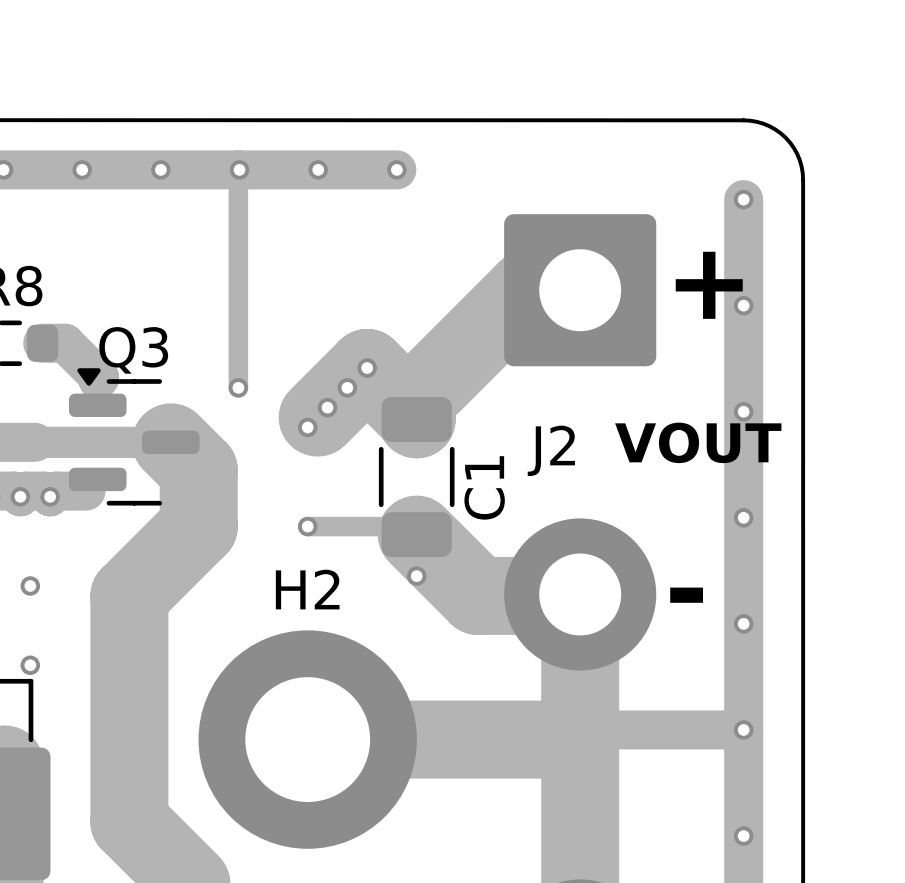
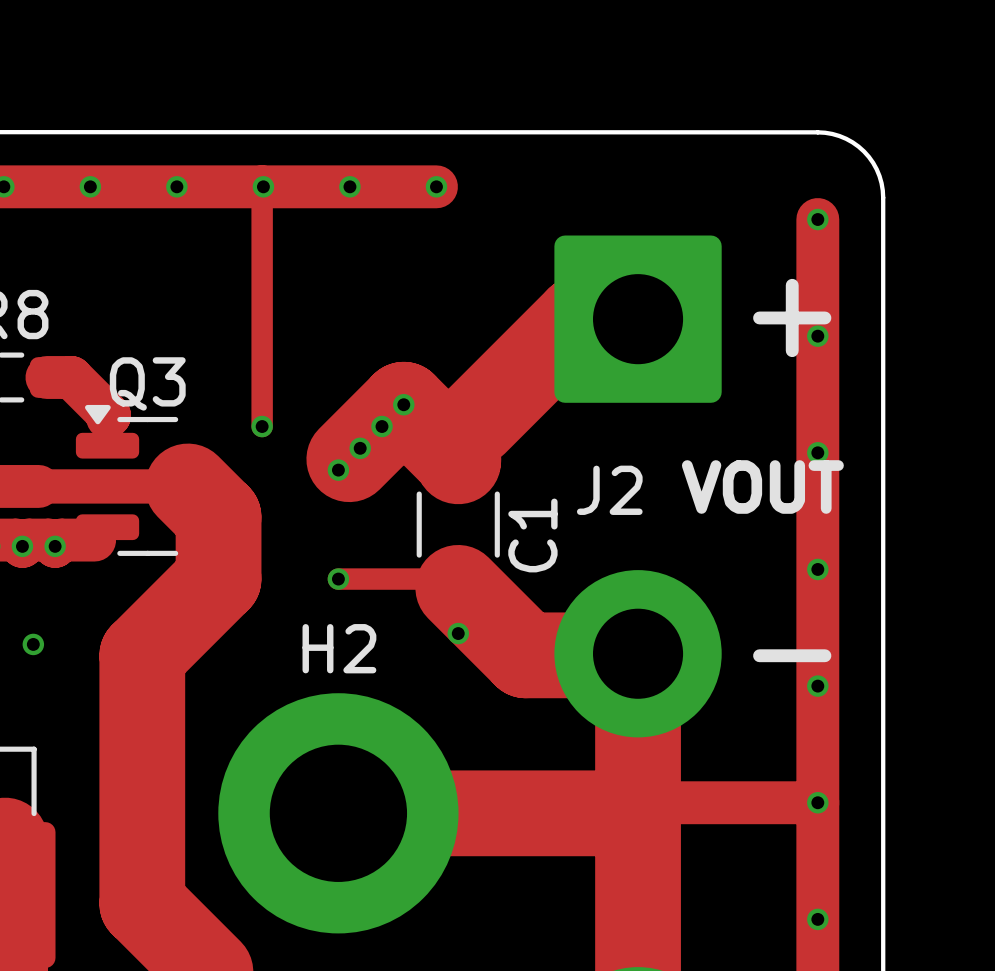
via: (30, 665) -> none

